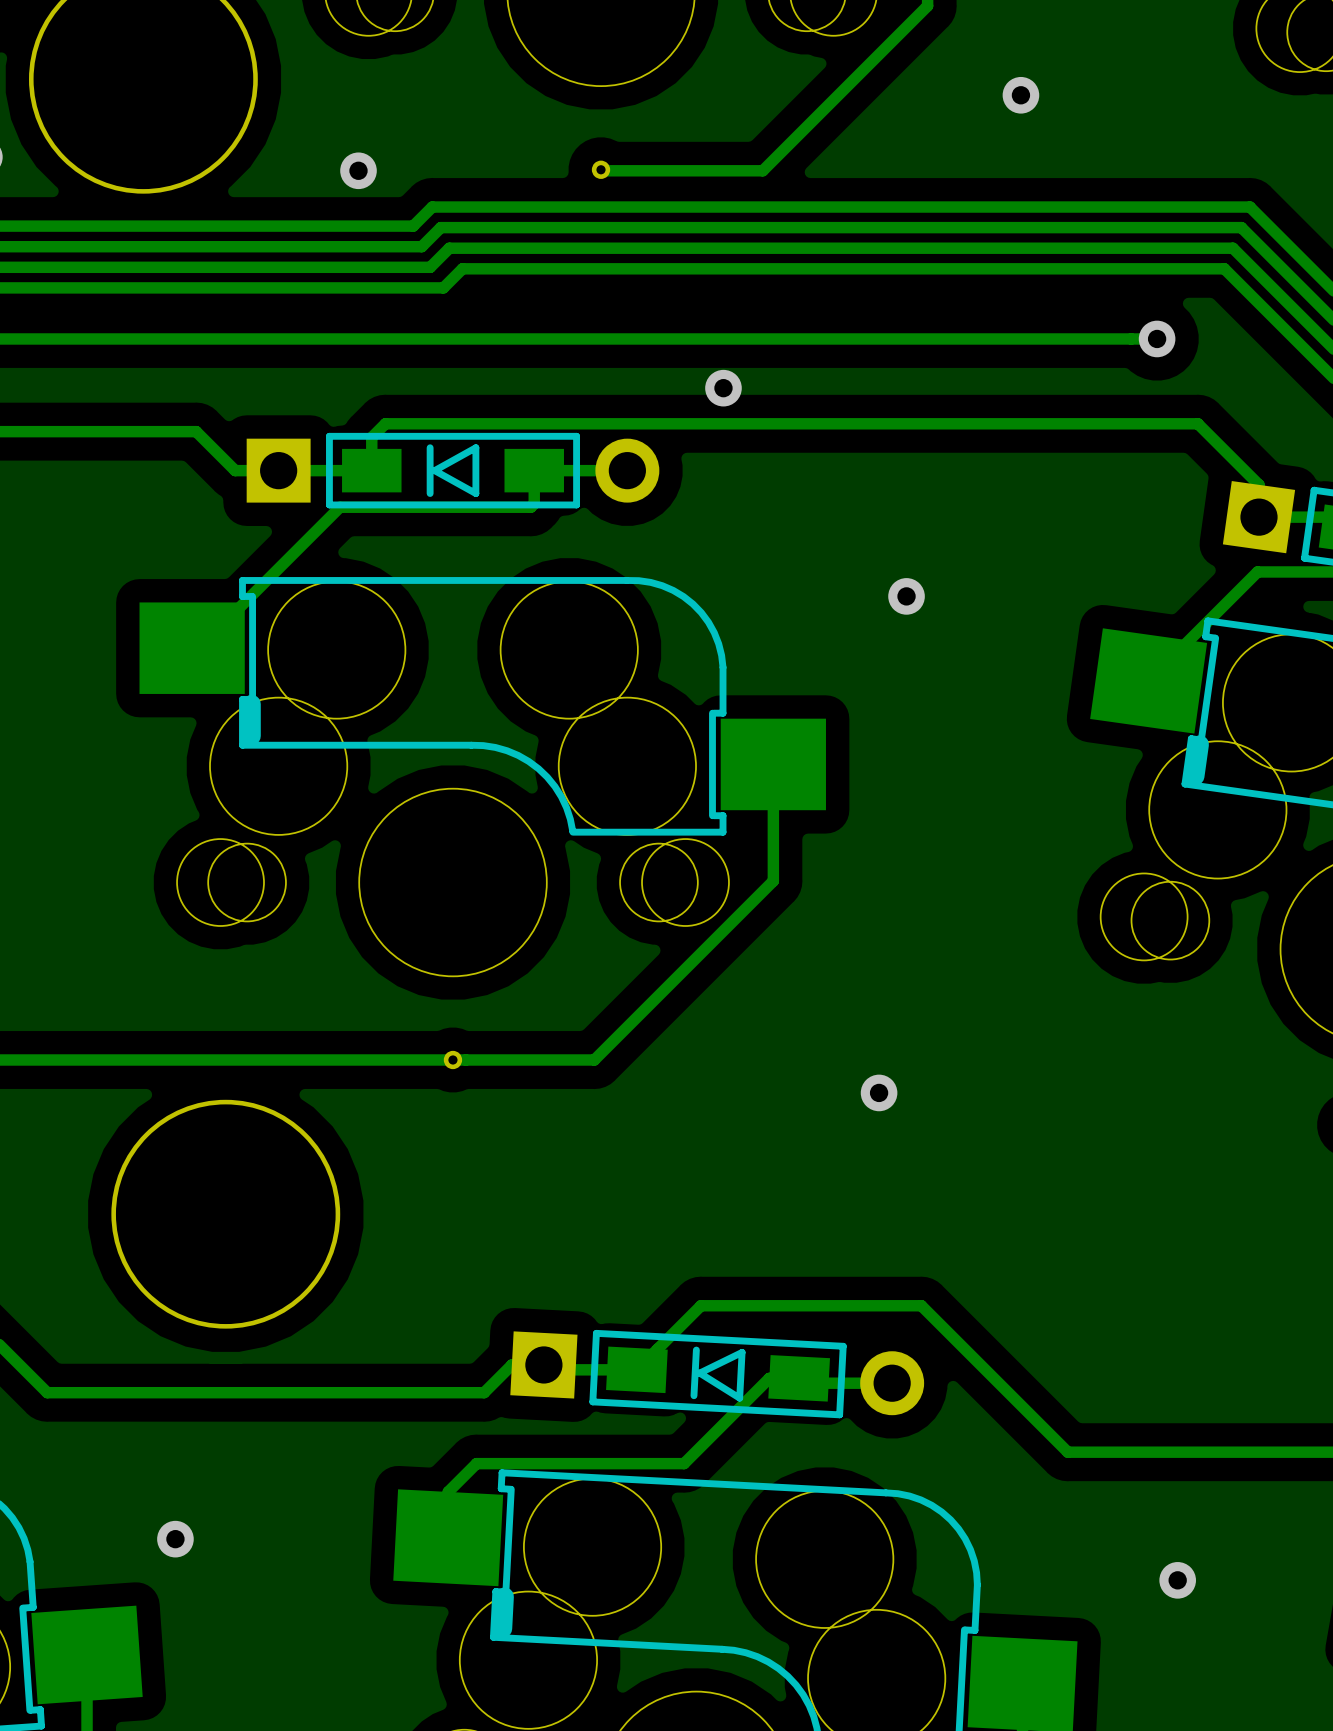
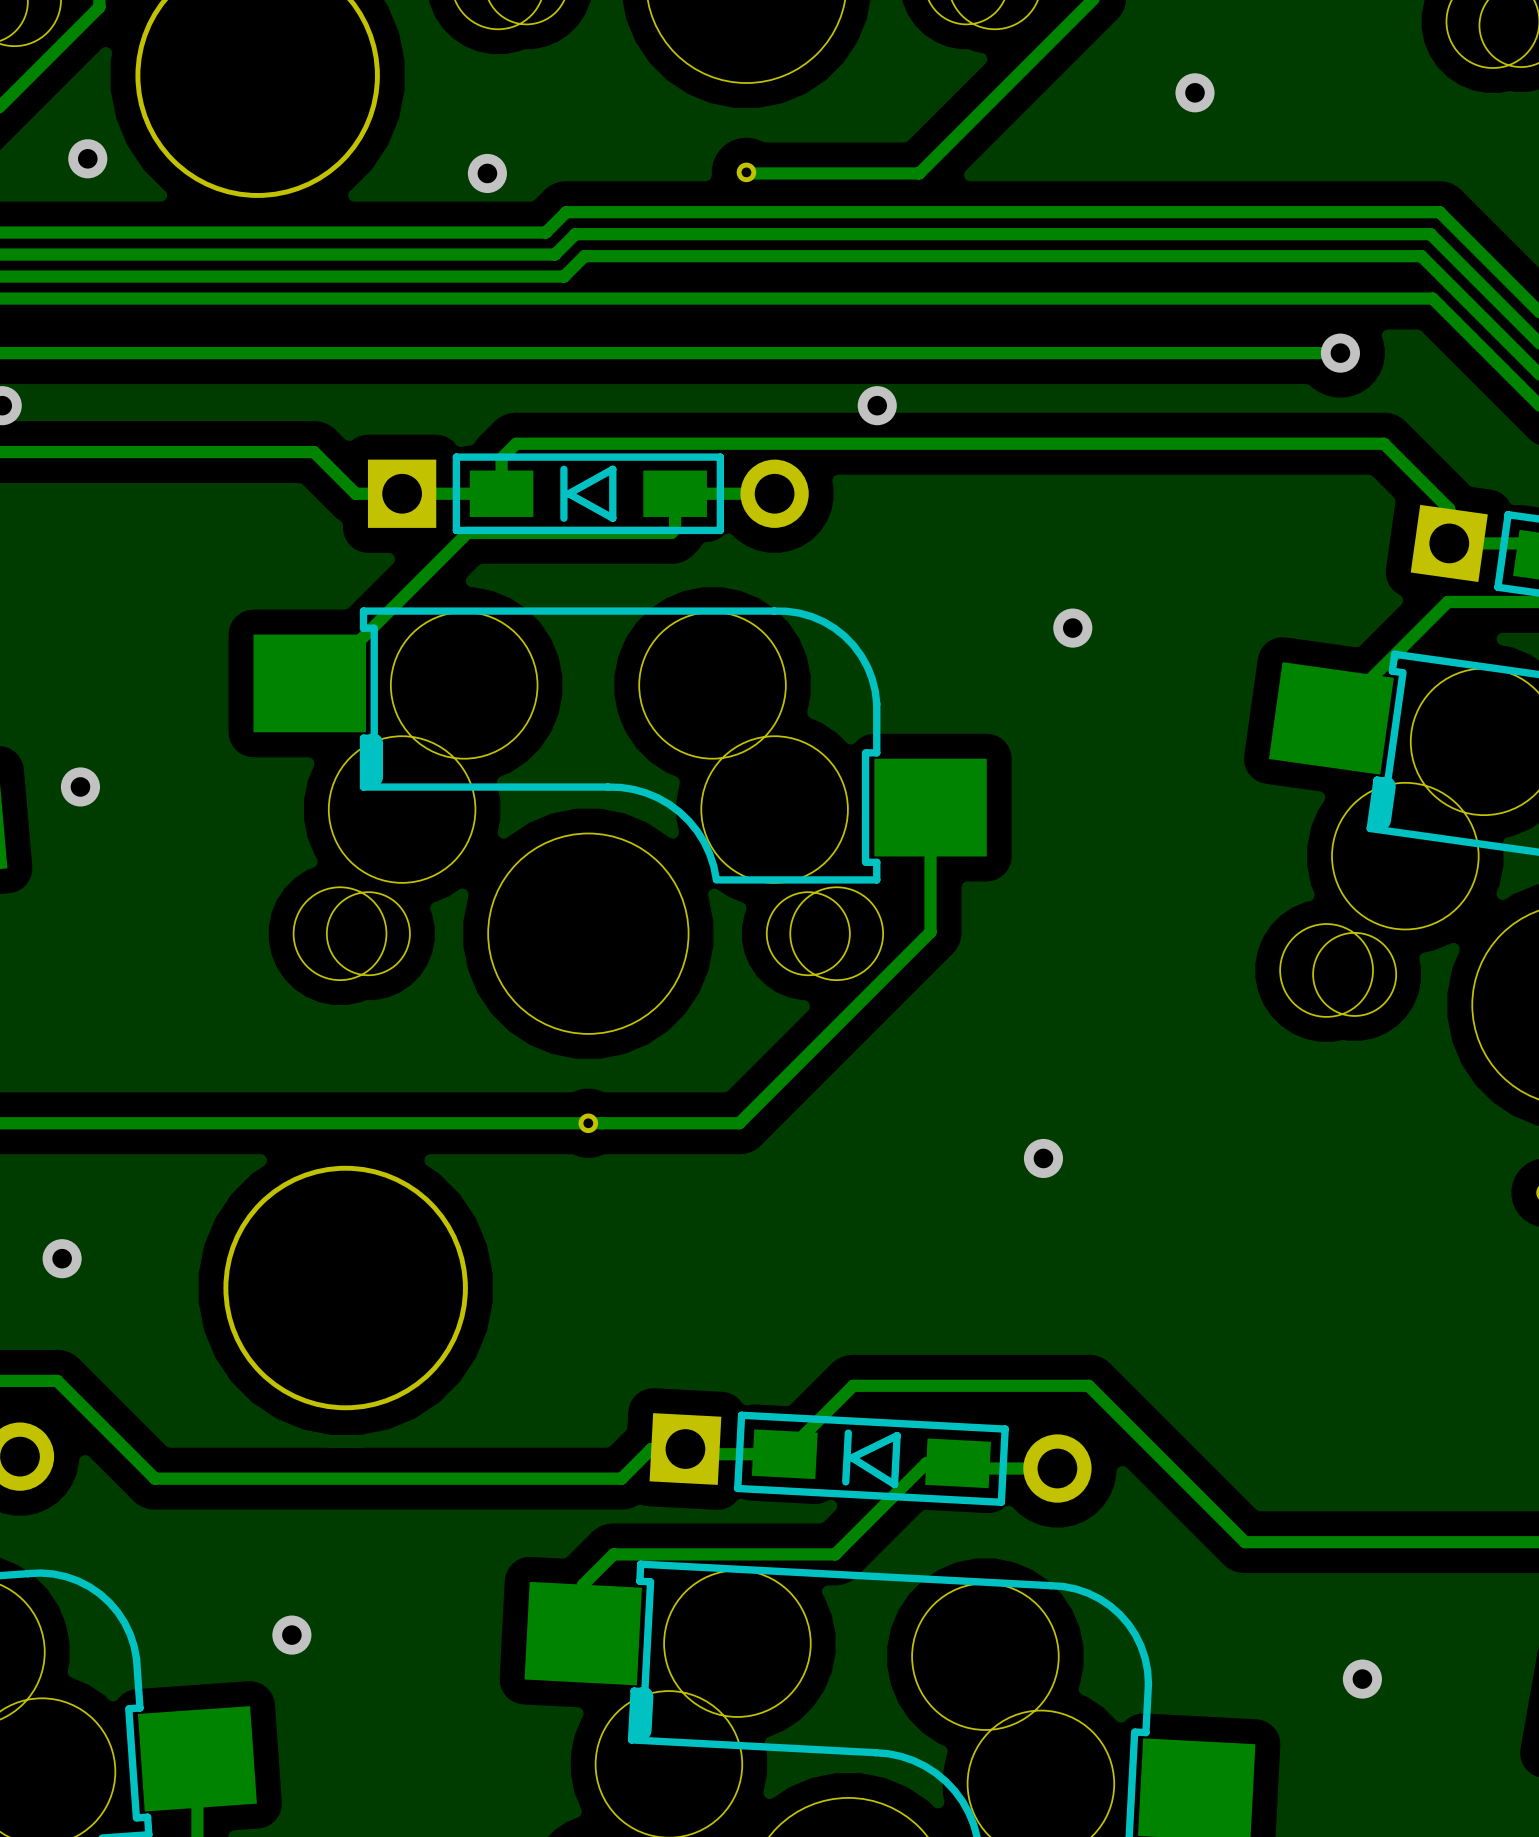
track: (1243, 287) (1224, 268) (462, 268) (443, 287) -> (1432, 298) (578, 298)

